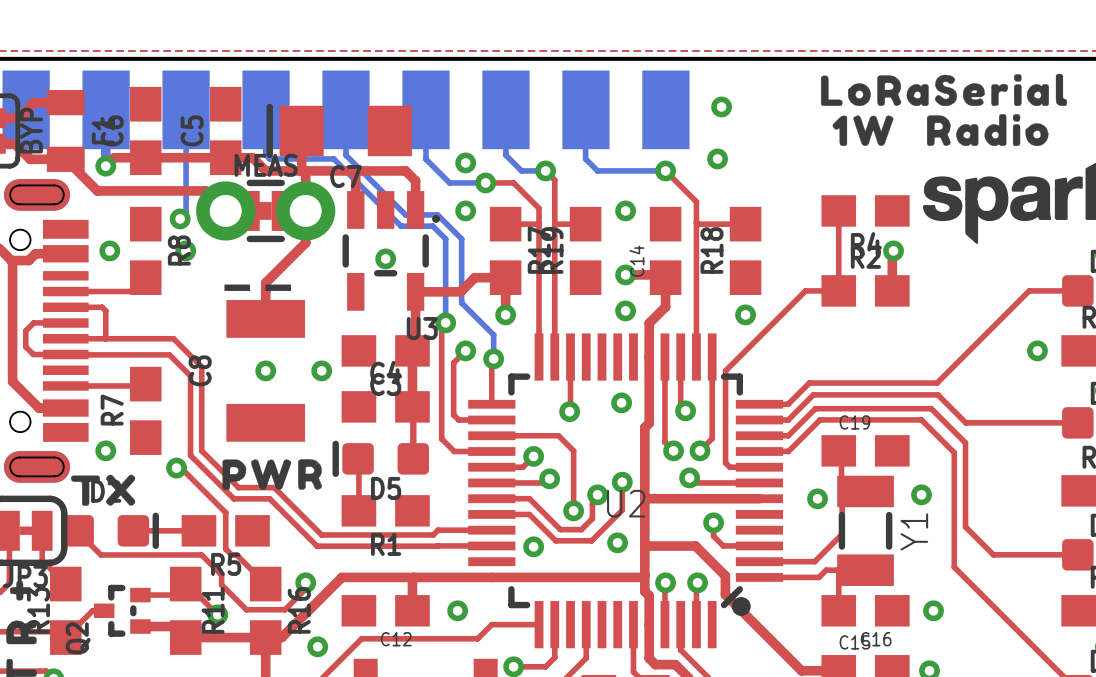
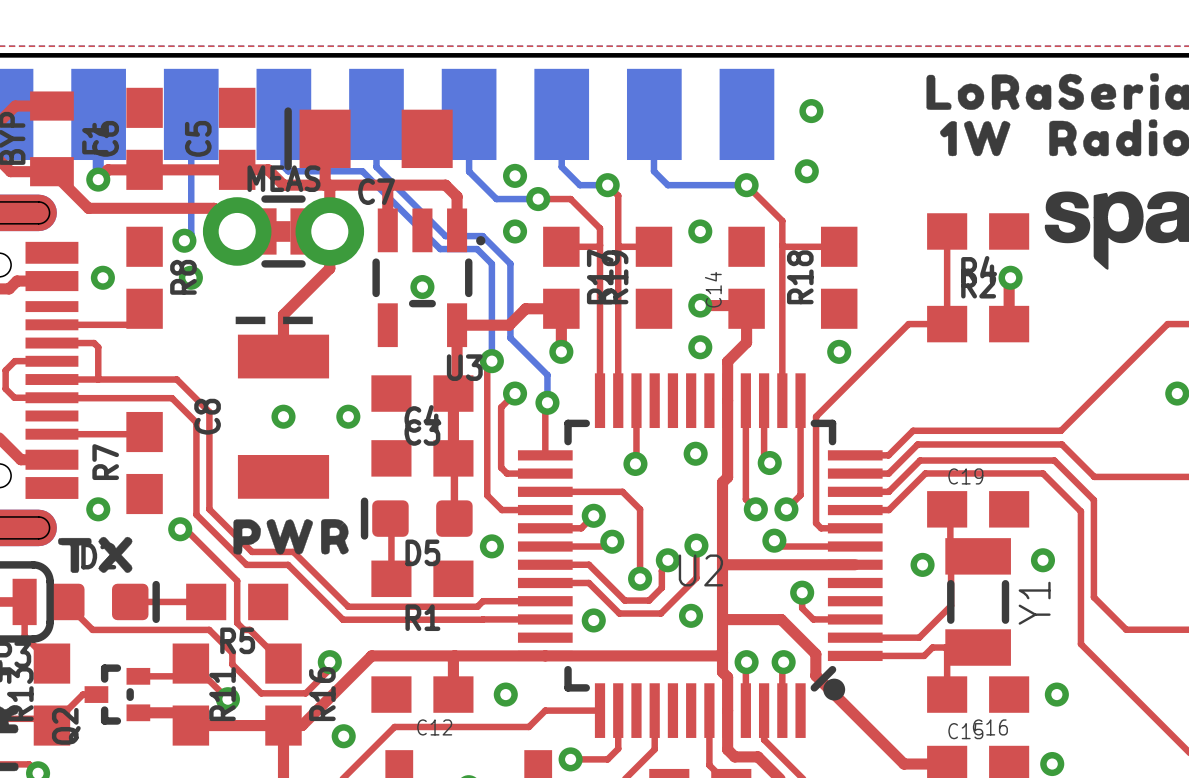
via: none -> (491, 546)

